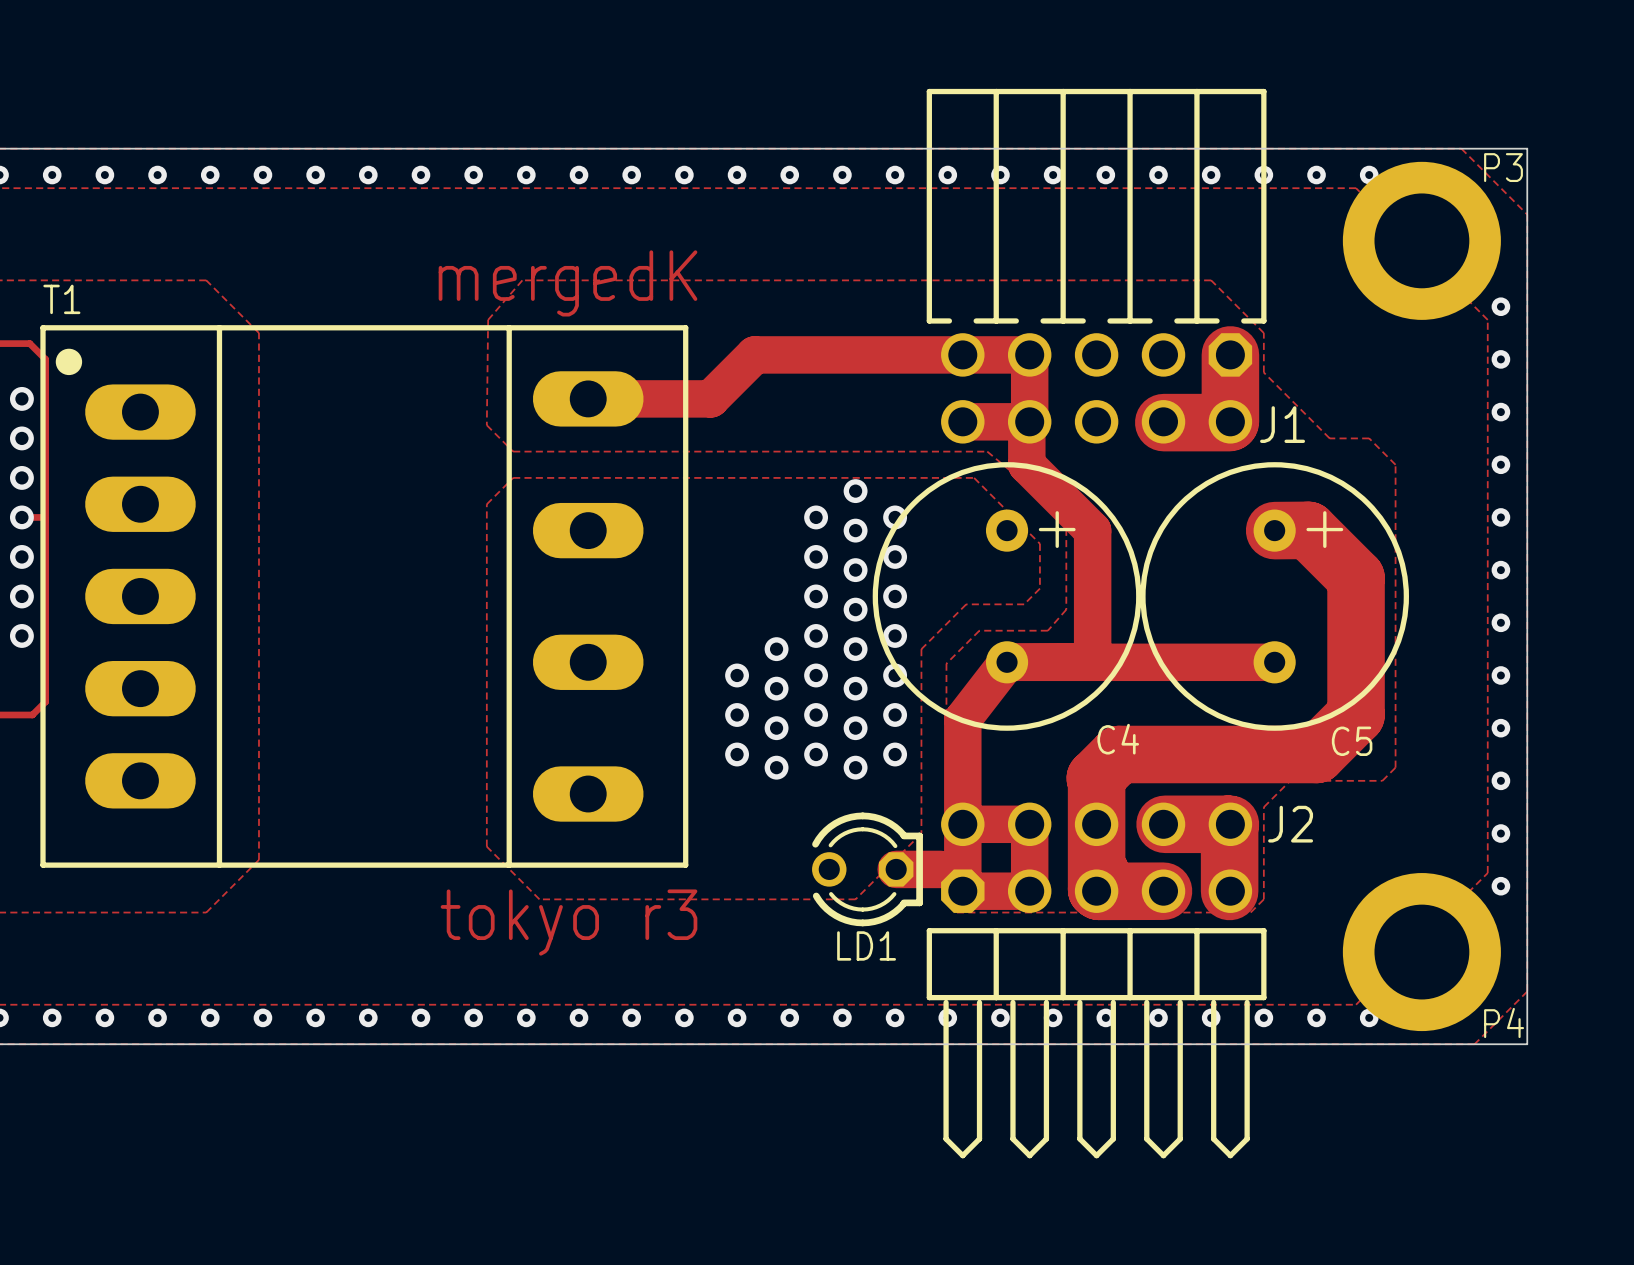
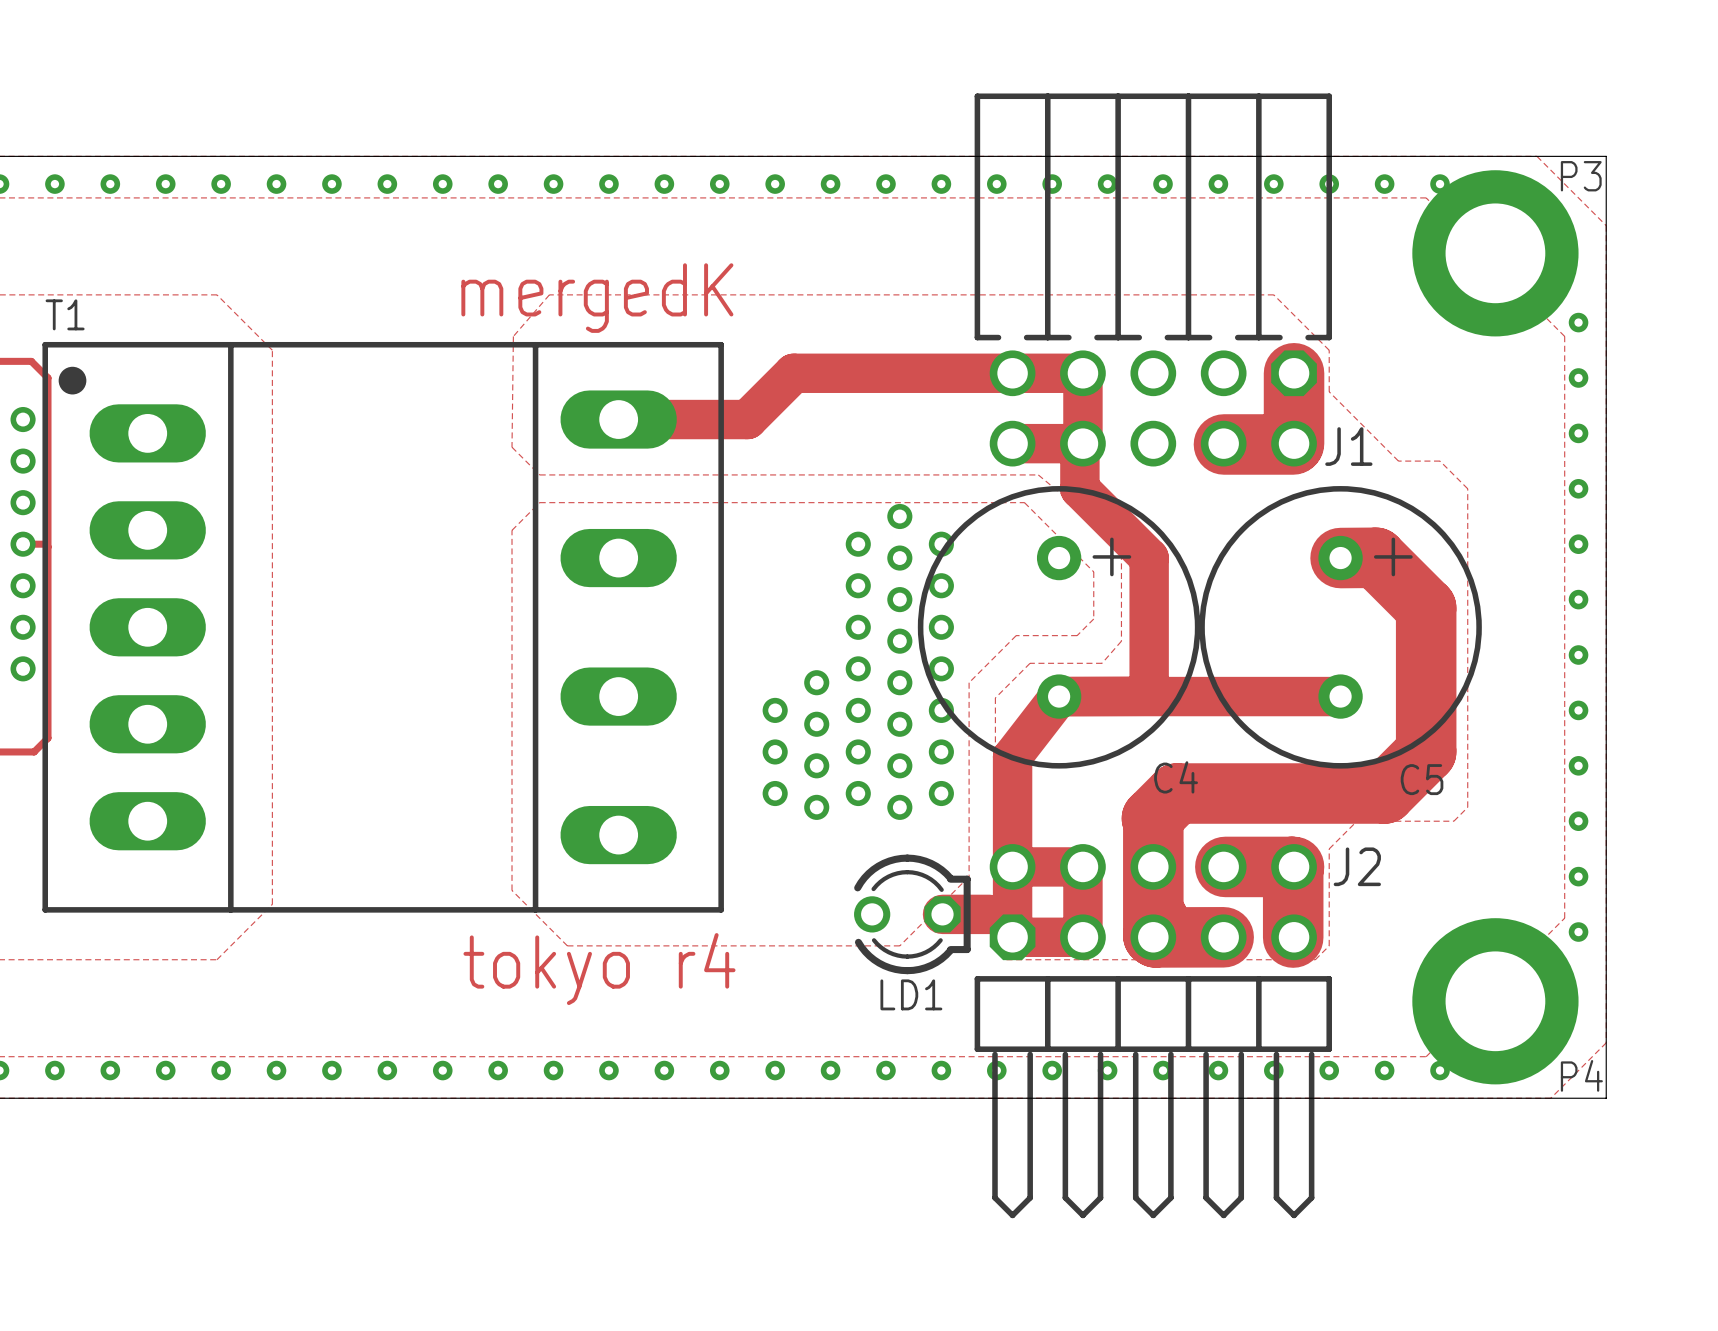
text: tokyo r3 (569, 922) -> tokyo r4 (599, 969)

